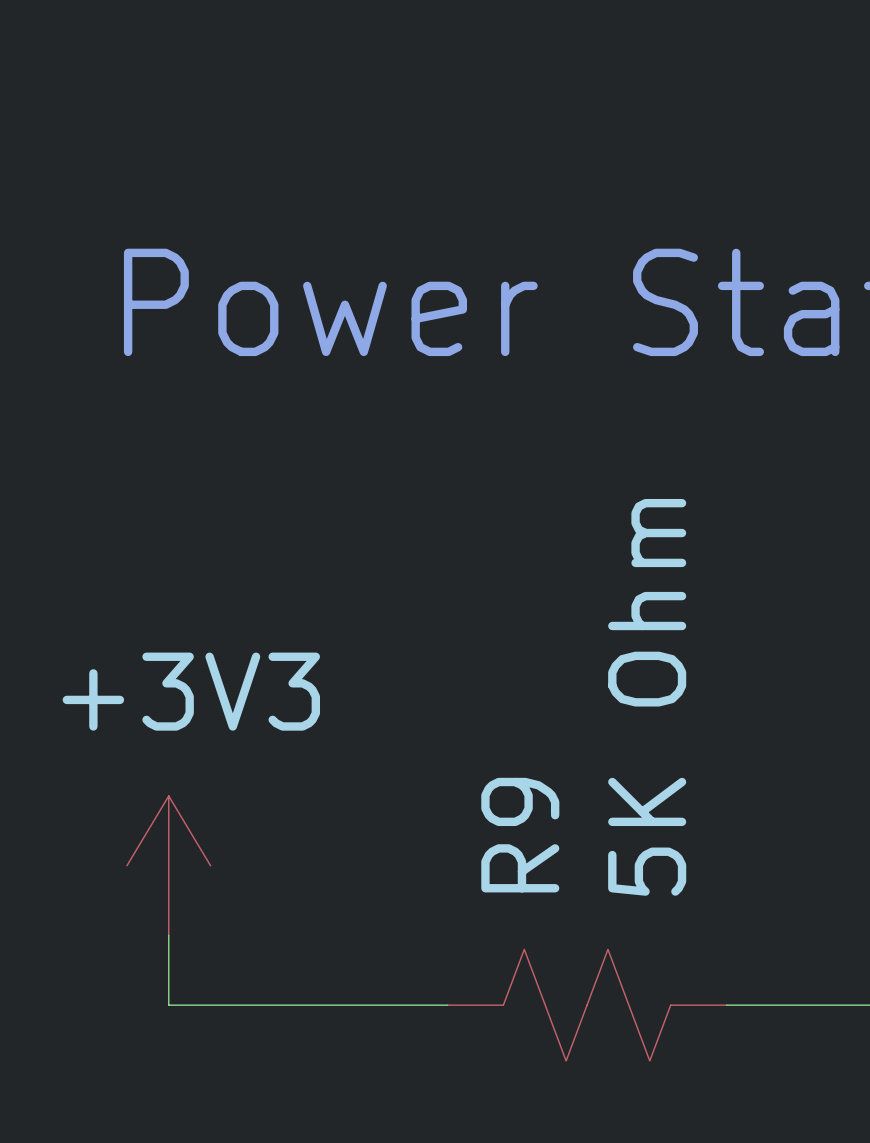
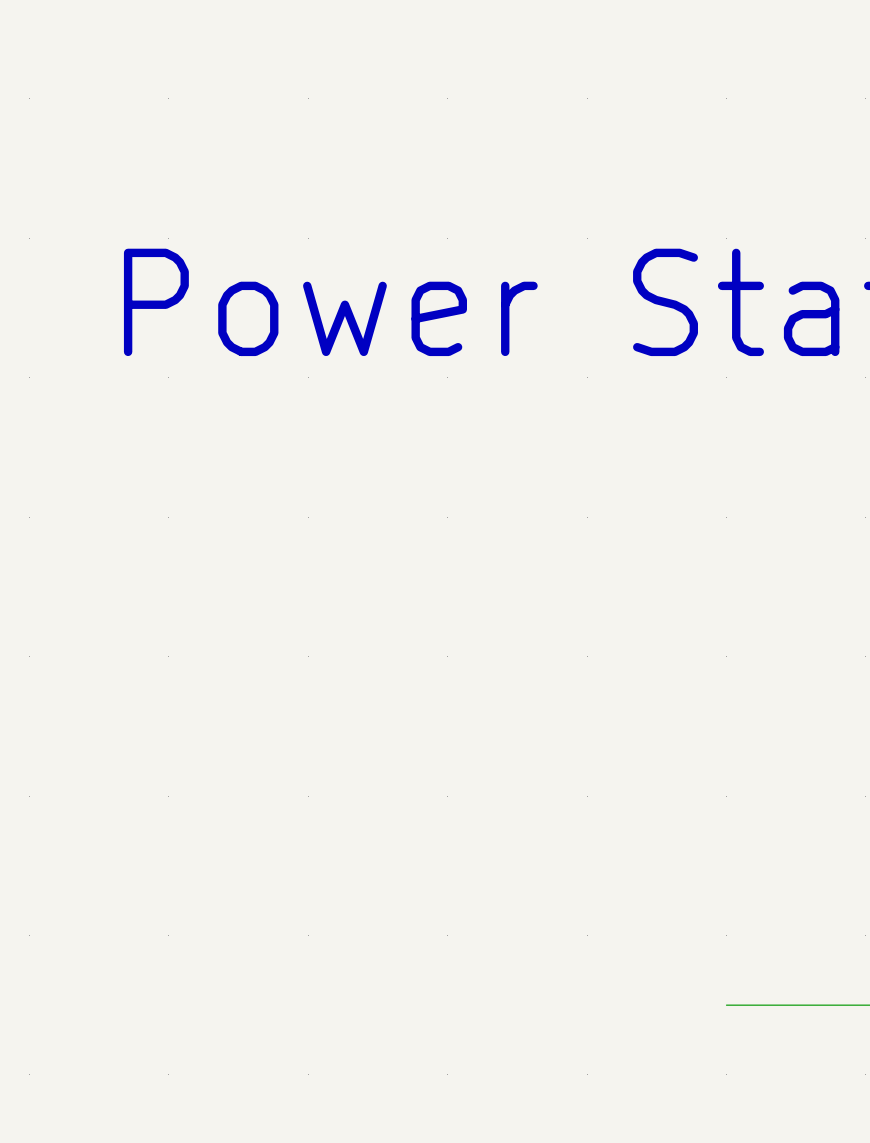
power symbol: +3V3 (168, 865) -> none
wire: (168, 935) (168, 1005) (447, 1005) -> none
R9: 5K Ohm (587, 1005) -> none

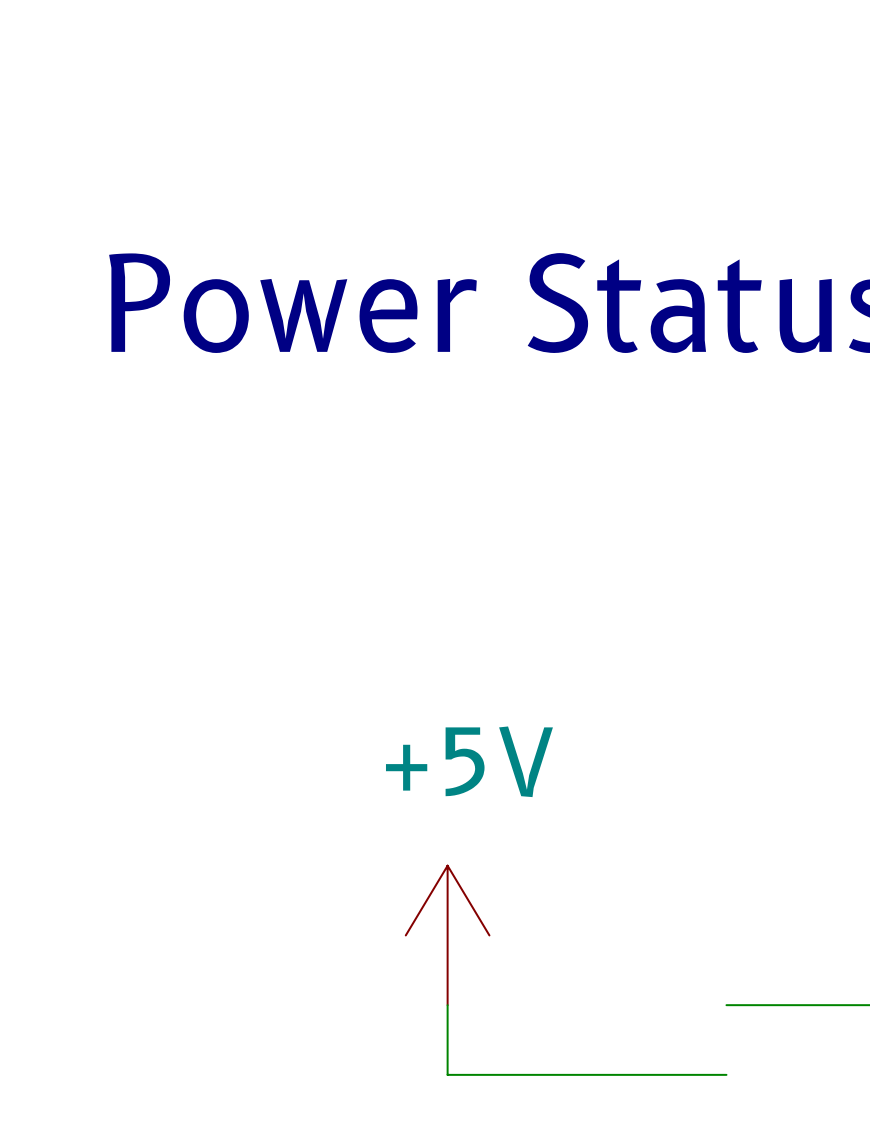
power symbol: none -> +5V (447, 935)
wire: none -> (447, 1005) (447, 1074) (726, 1074)

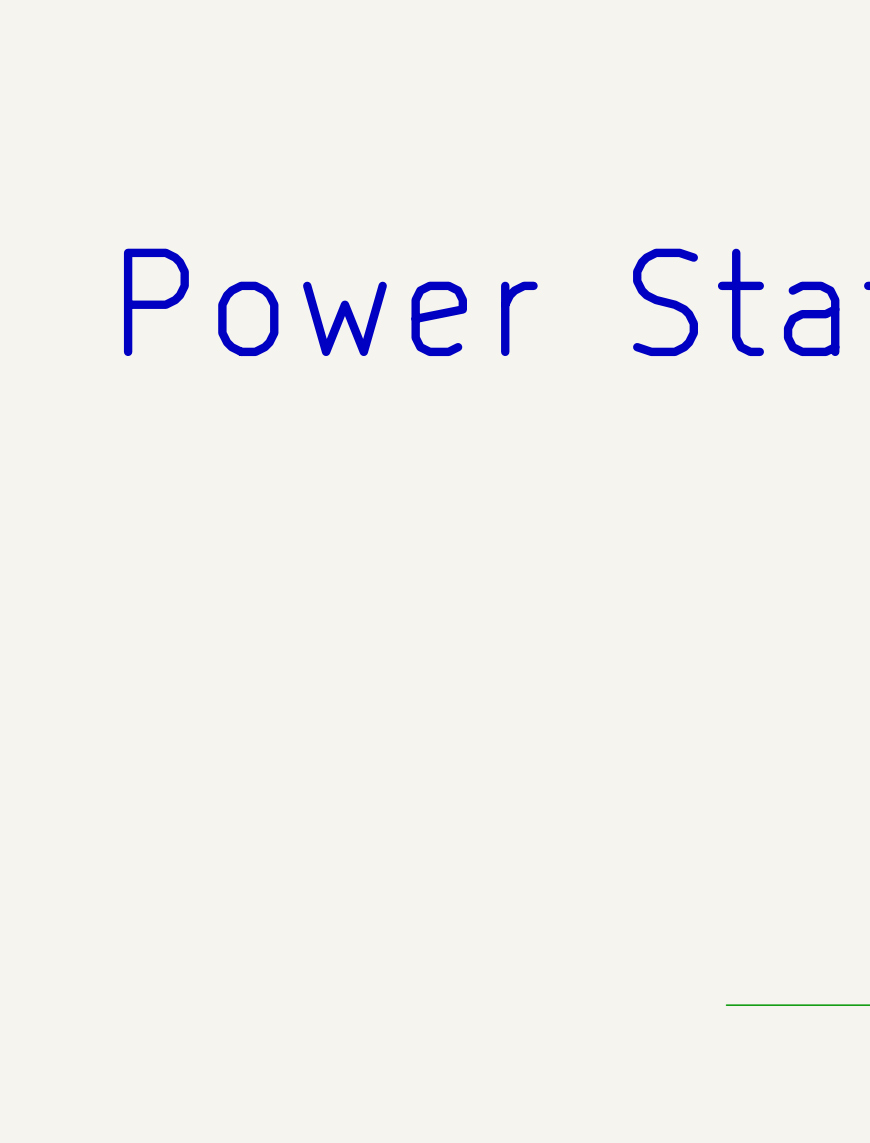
power symbol: +5V (447, 935) -> none
wire: (447, 1005) (447, 1074) (726, 1074) -> none

